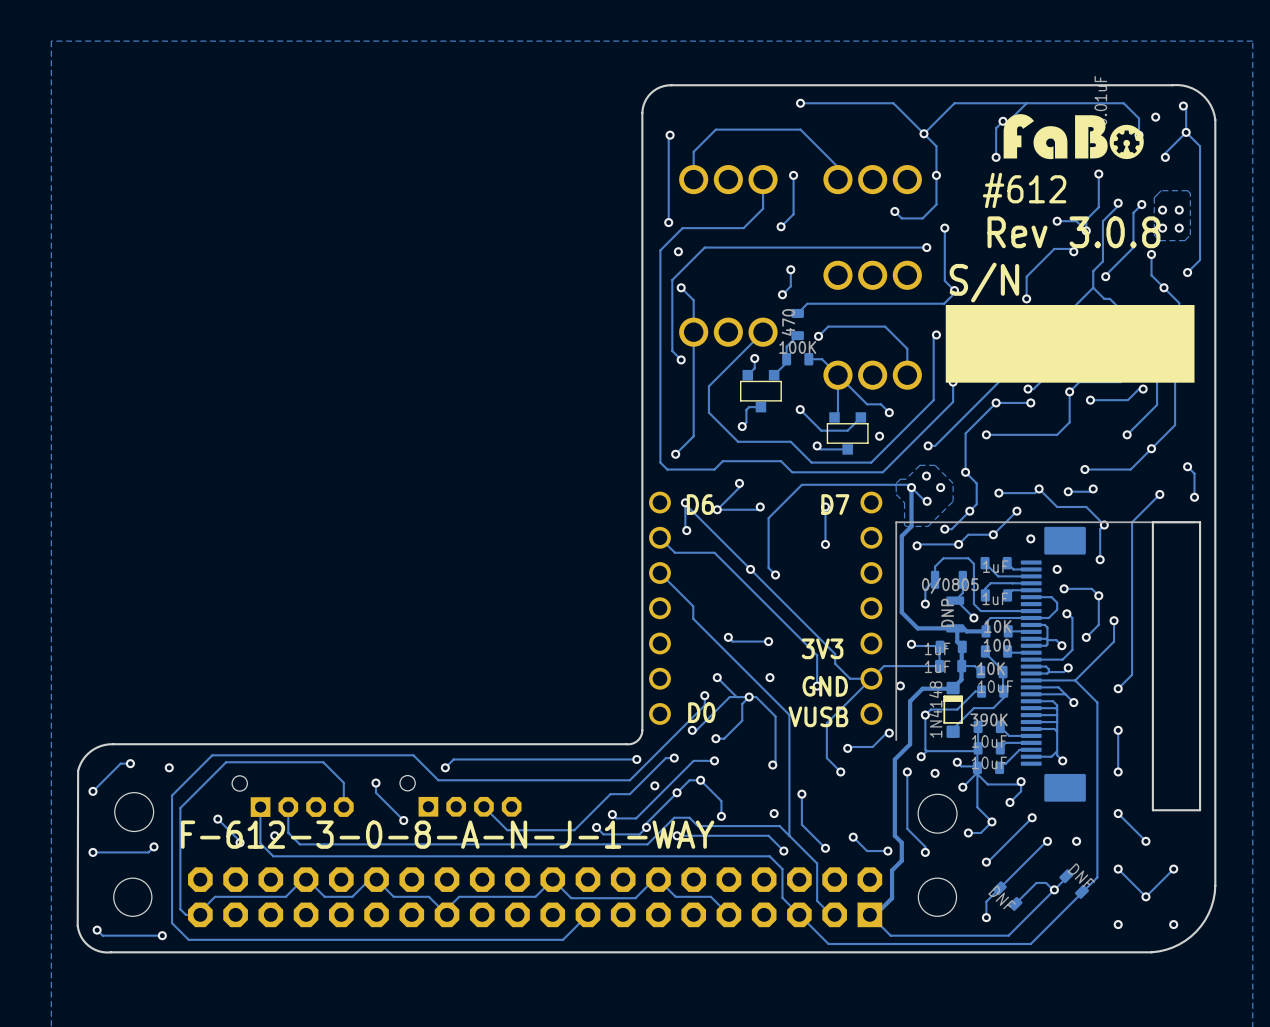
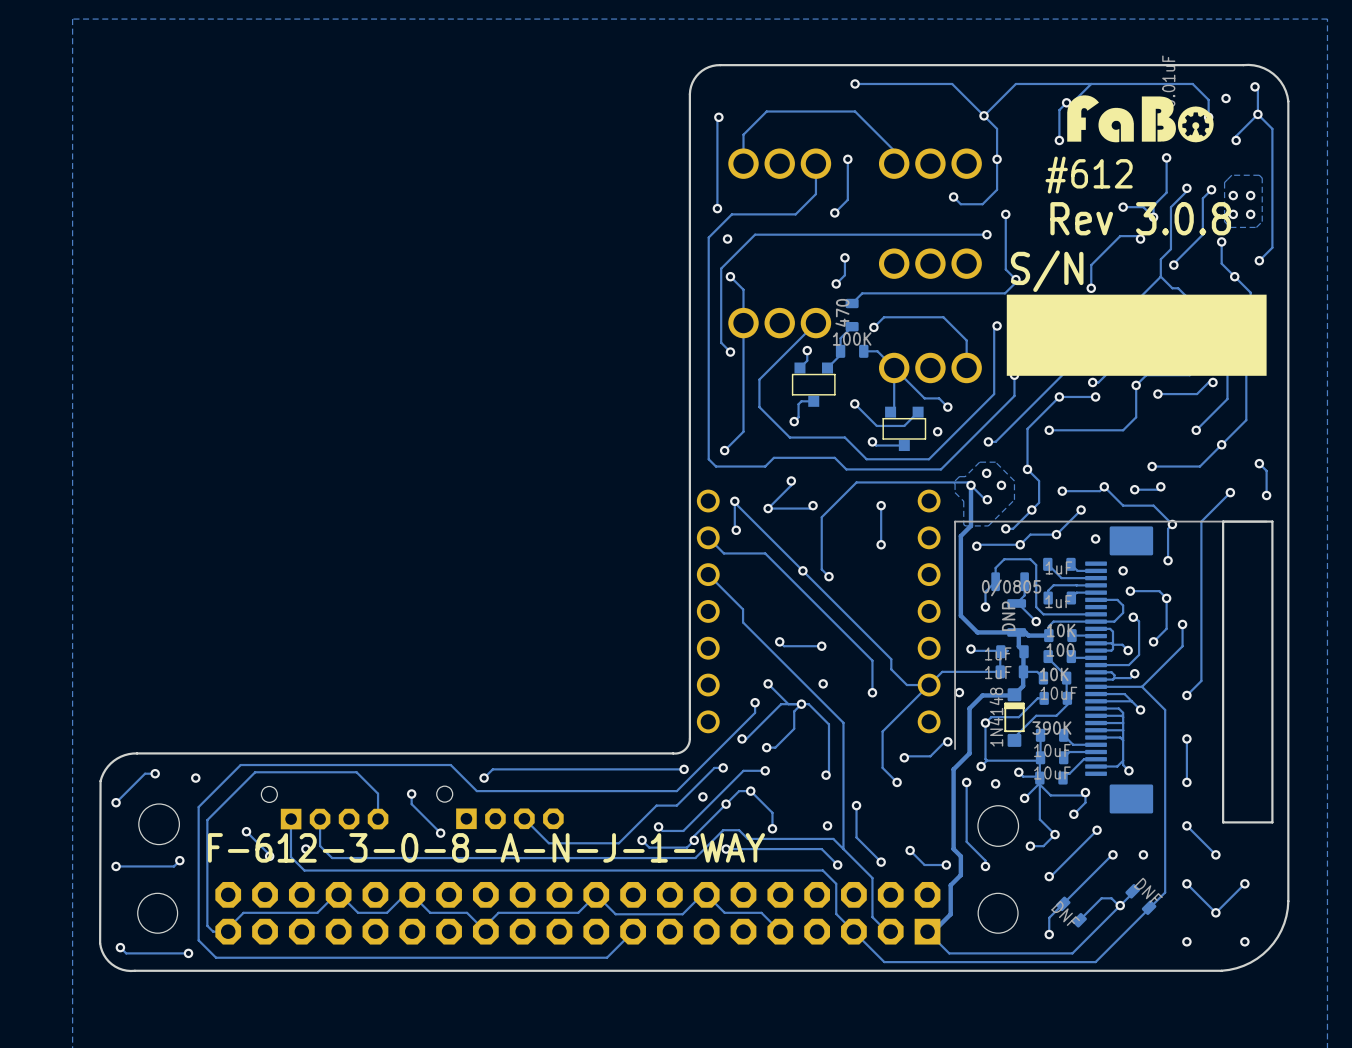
text: D6 (700, 504) -> none
text: D7 (835, 504) -> none
text: 3V3 (822, 648) -> none
text: GND (825, 686) -> none
text: D0 (701, 712) -> none
text: VUSB (818, 716) -> none

